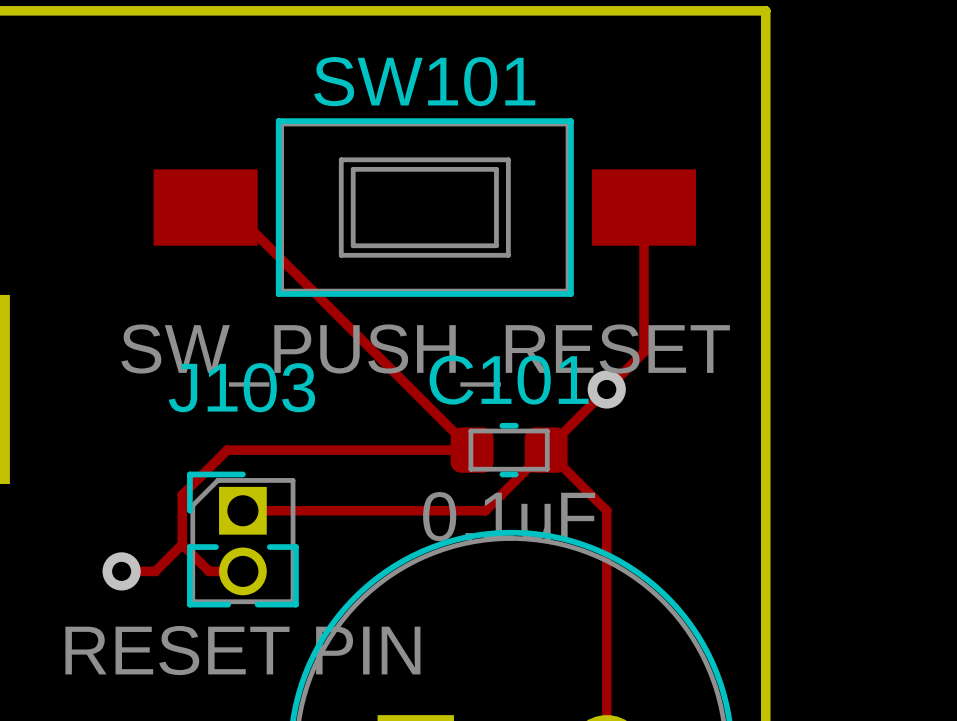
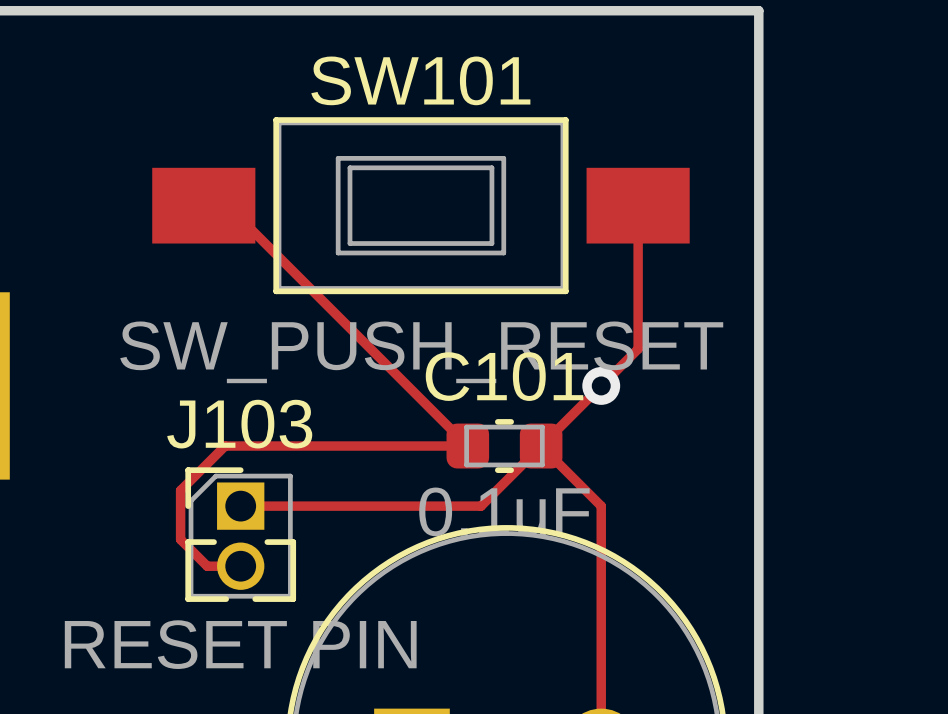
J103 name position: J103 (241, 387) -> J103 (239, 424)
track: (182, 544) (155, 571) (121, 571) -> none
via: (121, 571) -> none

